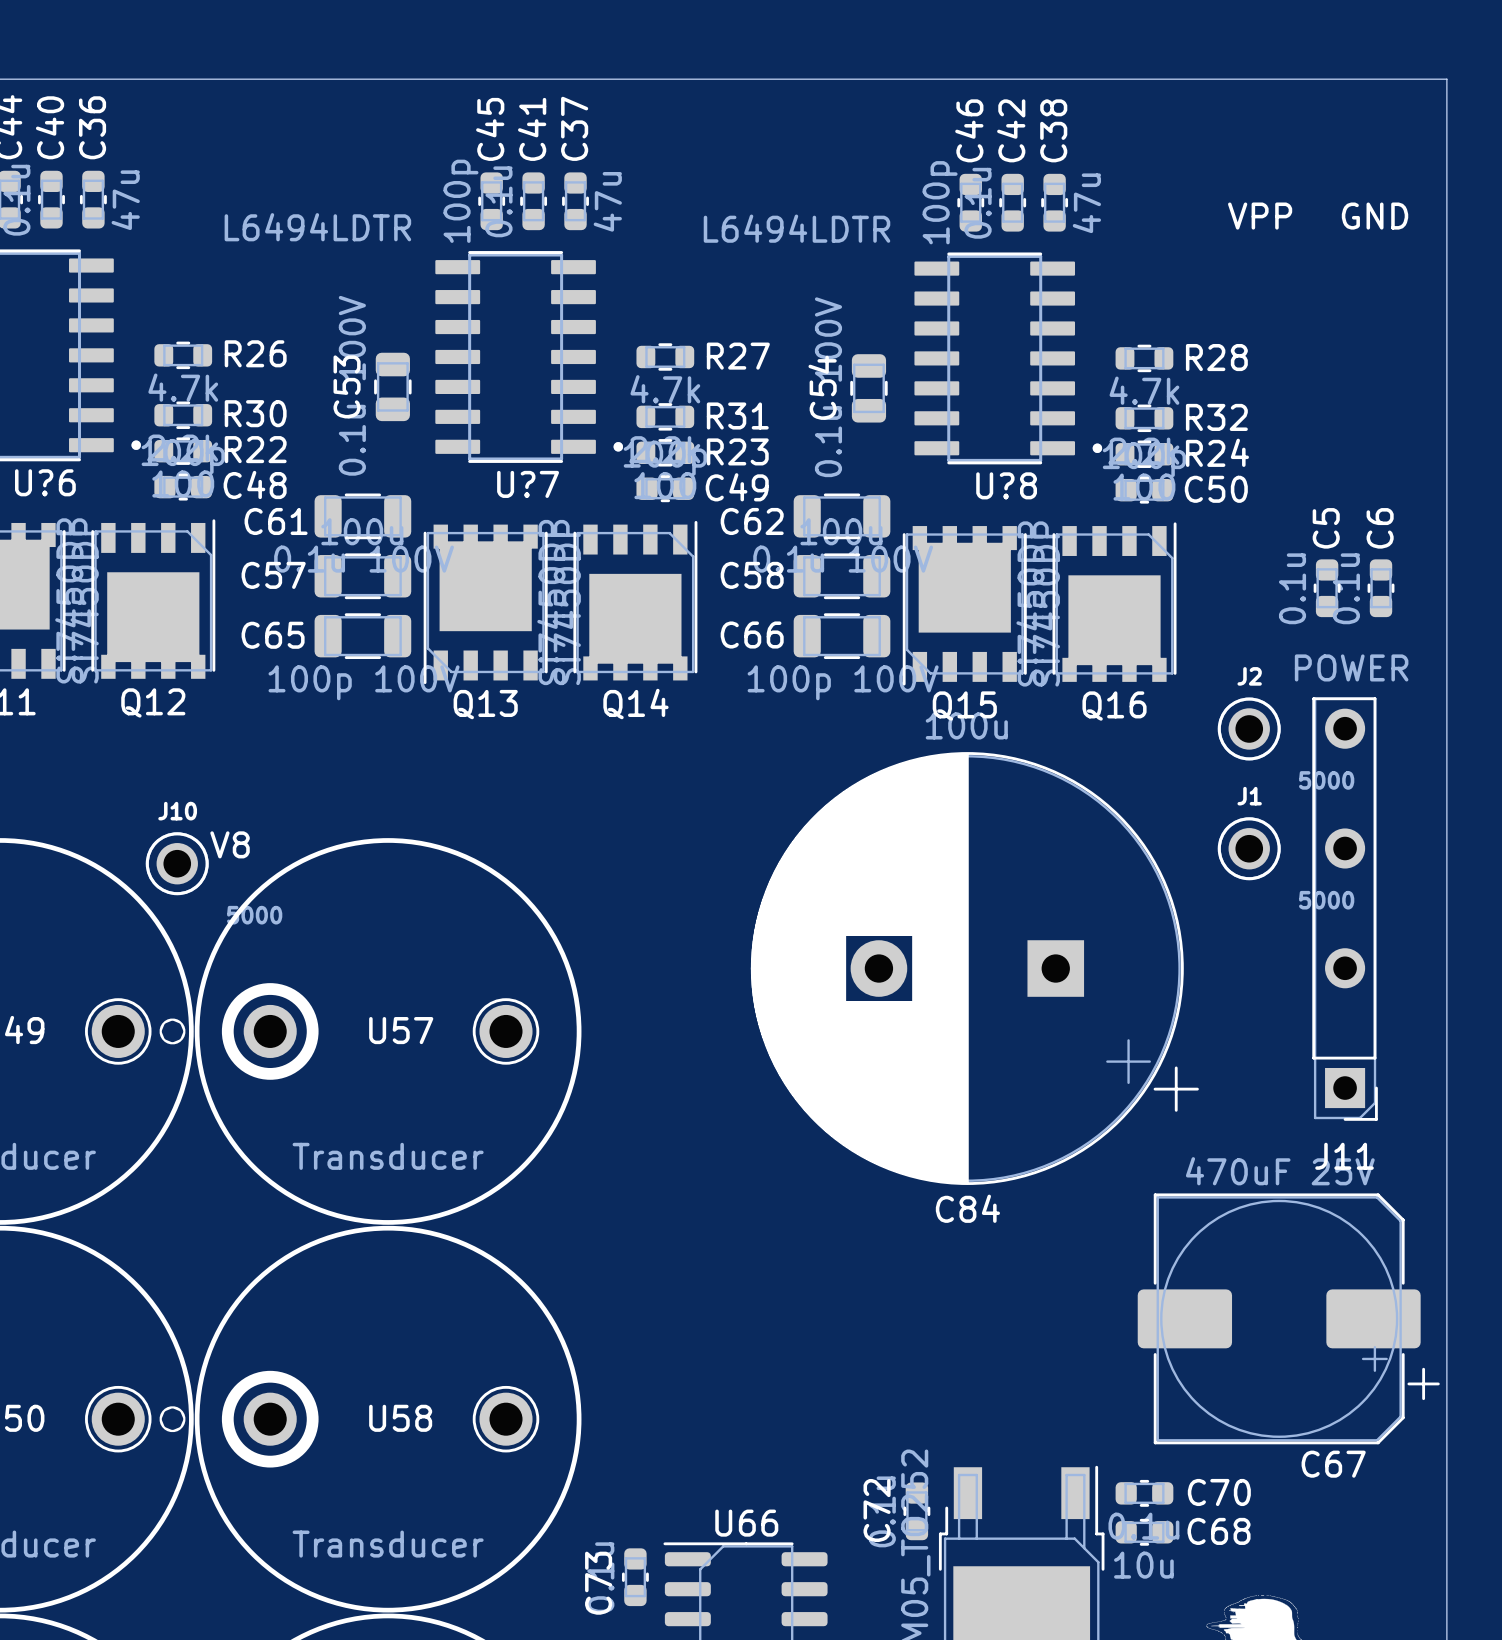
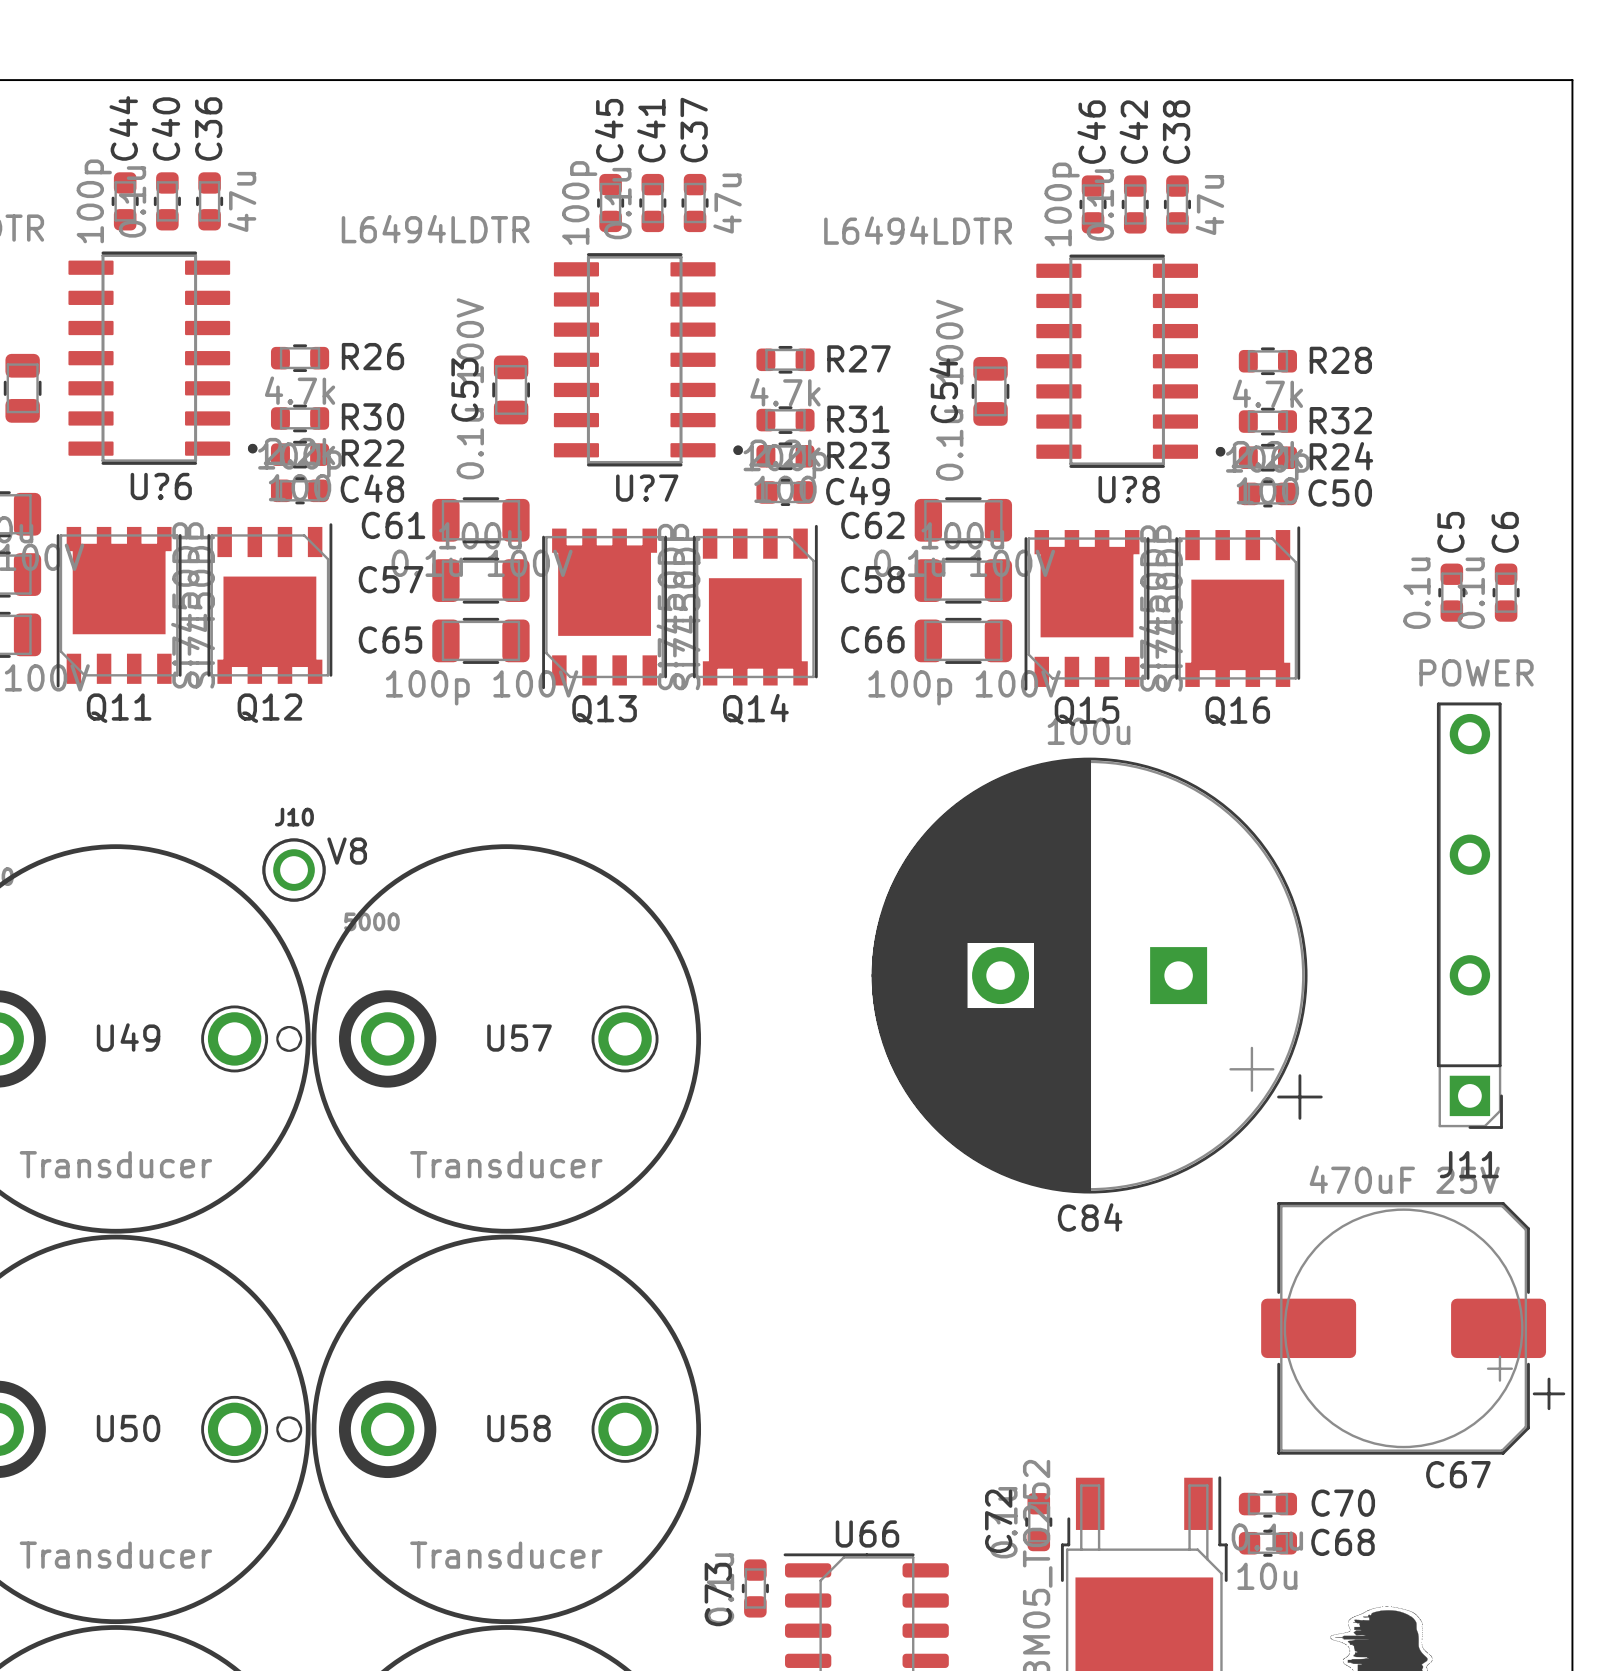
text: VPP (1260, 216) -> none
text: GND (1375, 216) -> none
J2: 5000 (1249, 728) -> none
J1: 5000 (1249, 848) -> none

